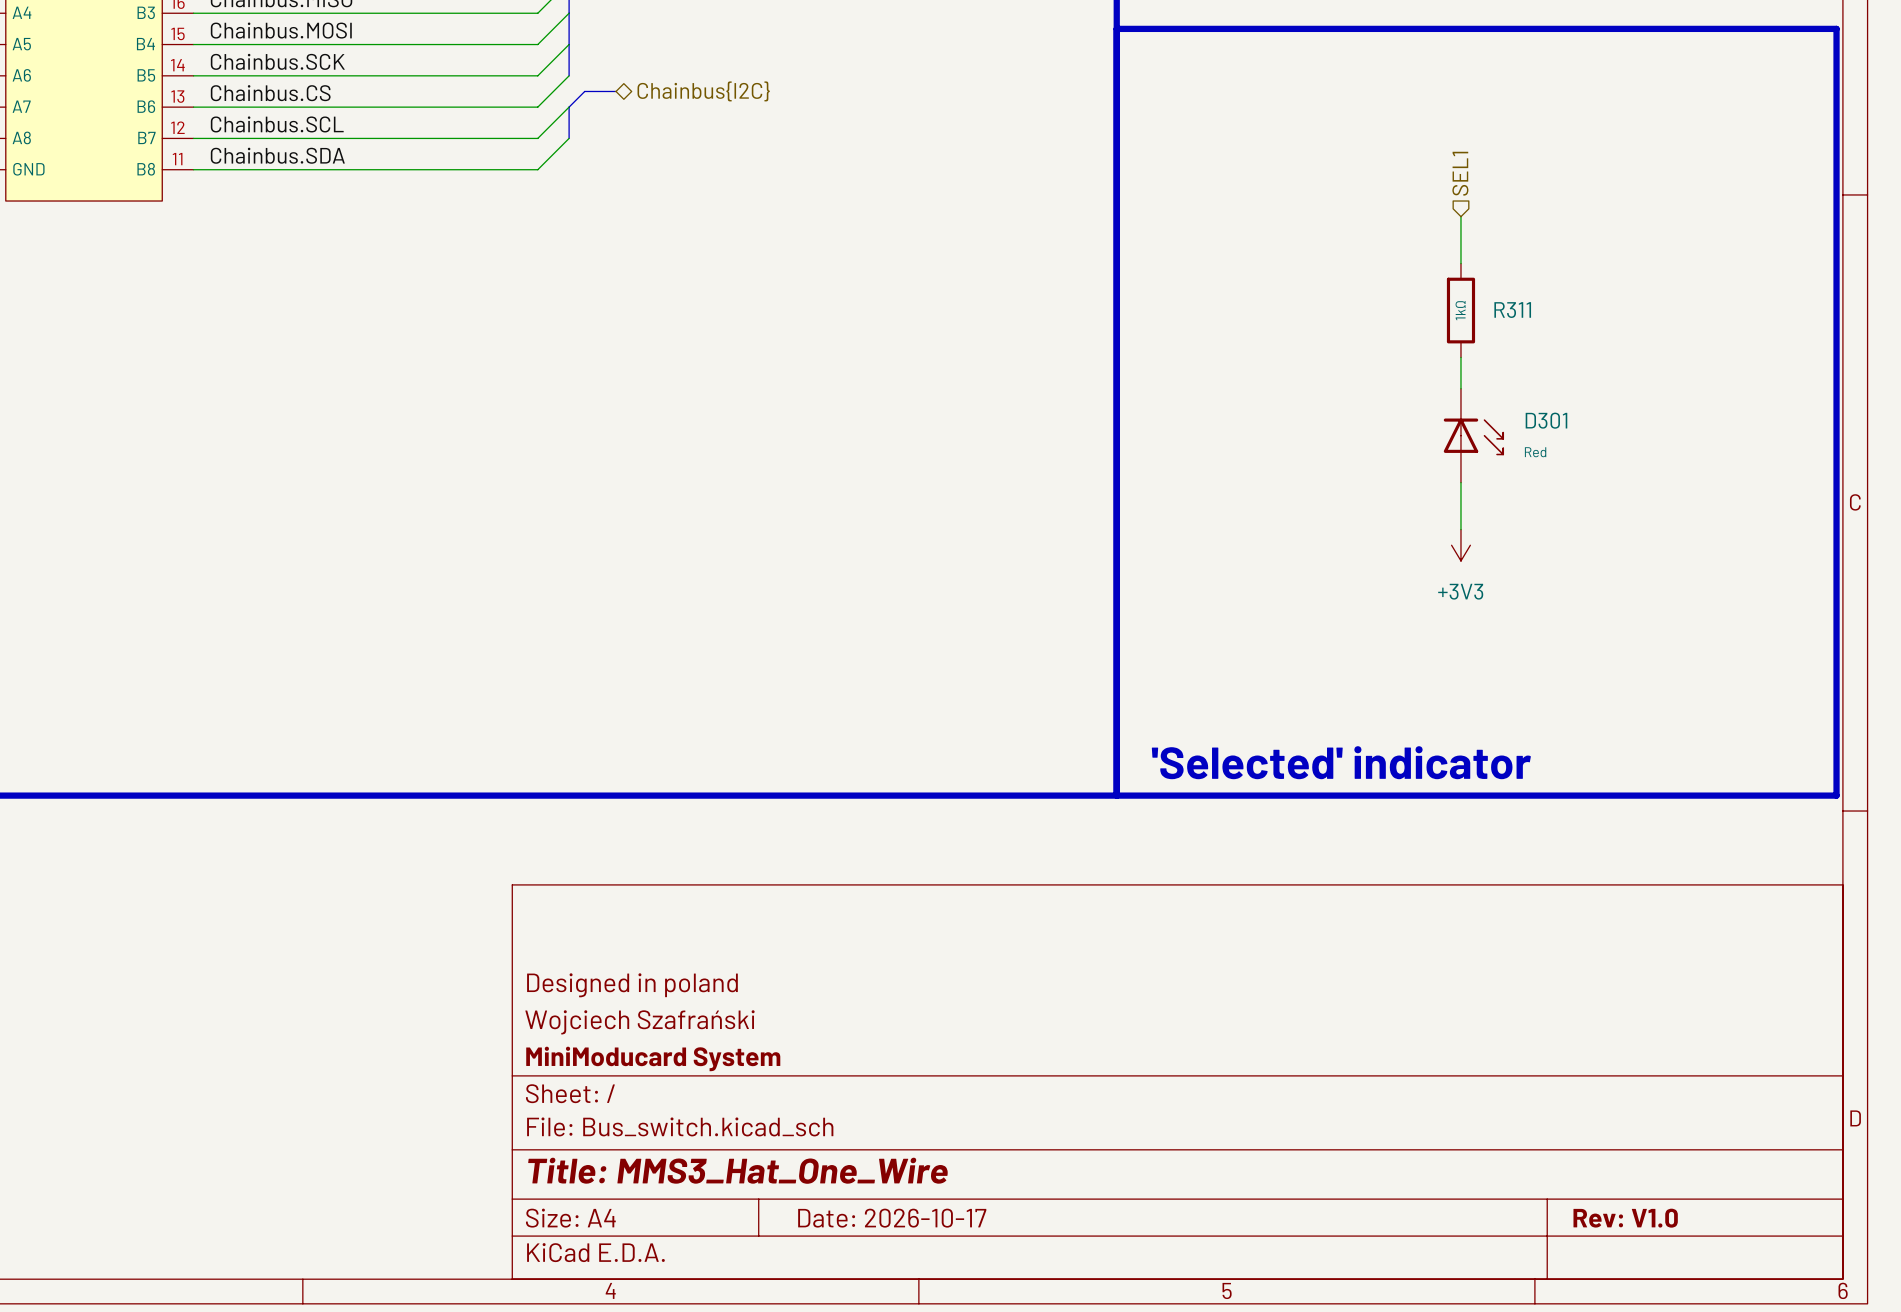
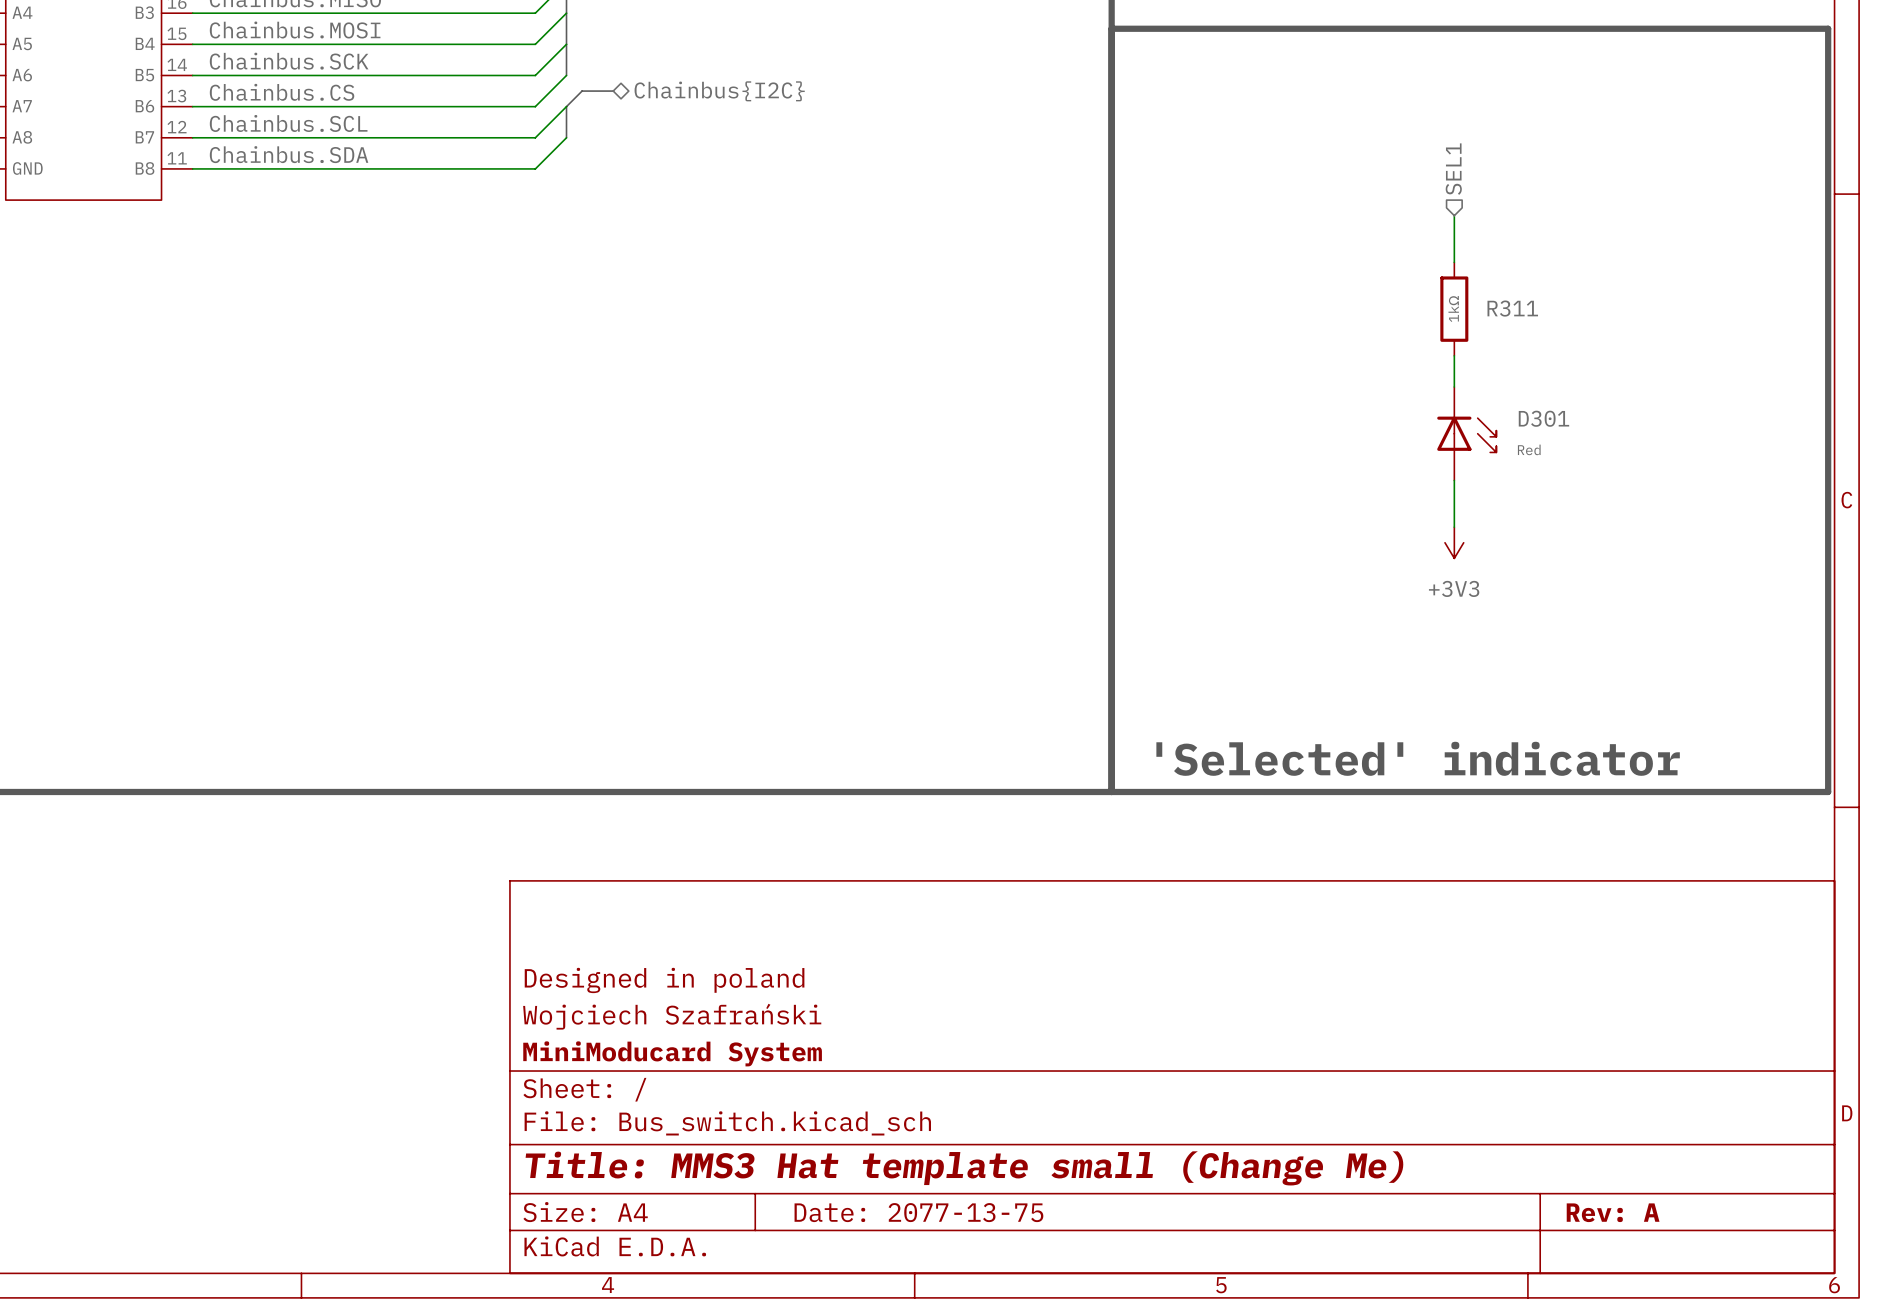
title block: Title: MMS3_Hat_One_Wire (737, 1170) -> Title: MMS3 Hat template small (Change Me) (964, 1168)
title block: Date: 2026-10-17 (892, 1218) -> Date: 2077-13-75 (918, 1212)
title block: Rev: V1.0 (1625, 1218) -> Rev: A (1613, 1212)

